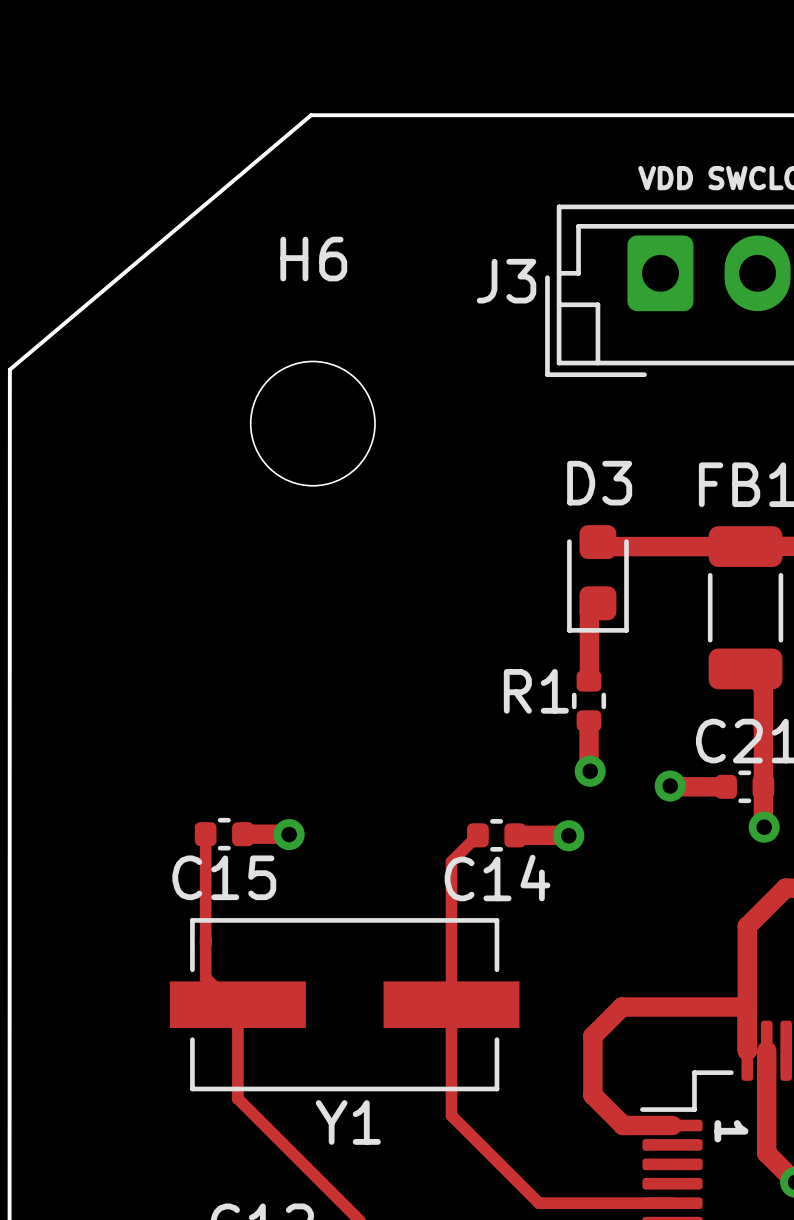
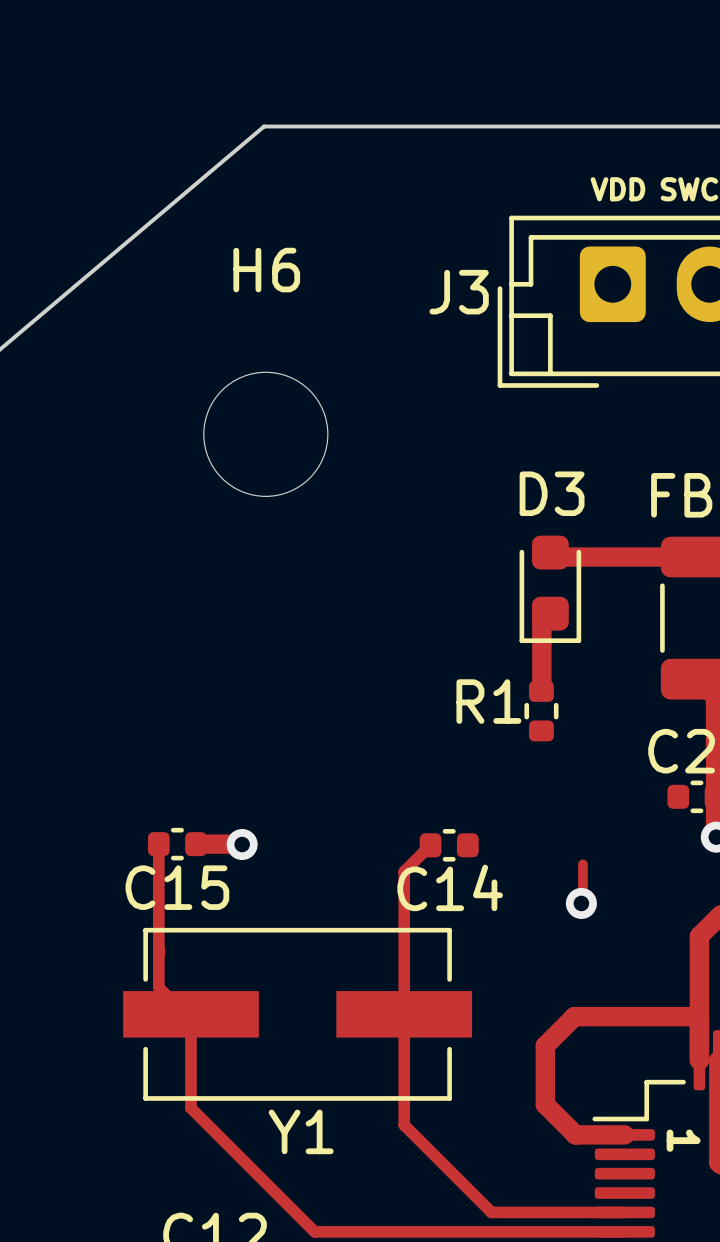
top track: (589, 720) (590, 771) -> none
via: (590, 771) -> none
top track: (670, 786) (726, 786) -> none
via: (670, 786) -> none
top track: (515, 835) (568, 835) -> none
via: (568, 835) -> none
top track: none -> (582, 864) (581, 903)
via: none -> (581, 903)

